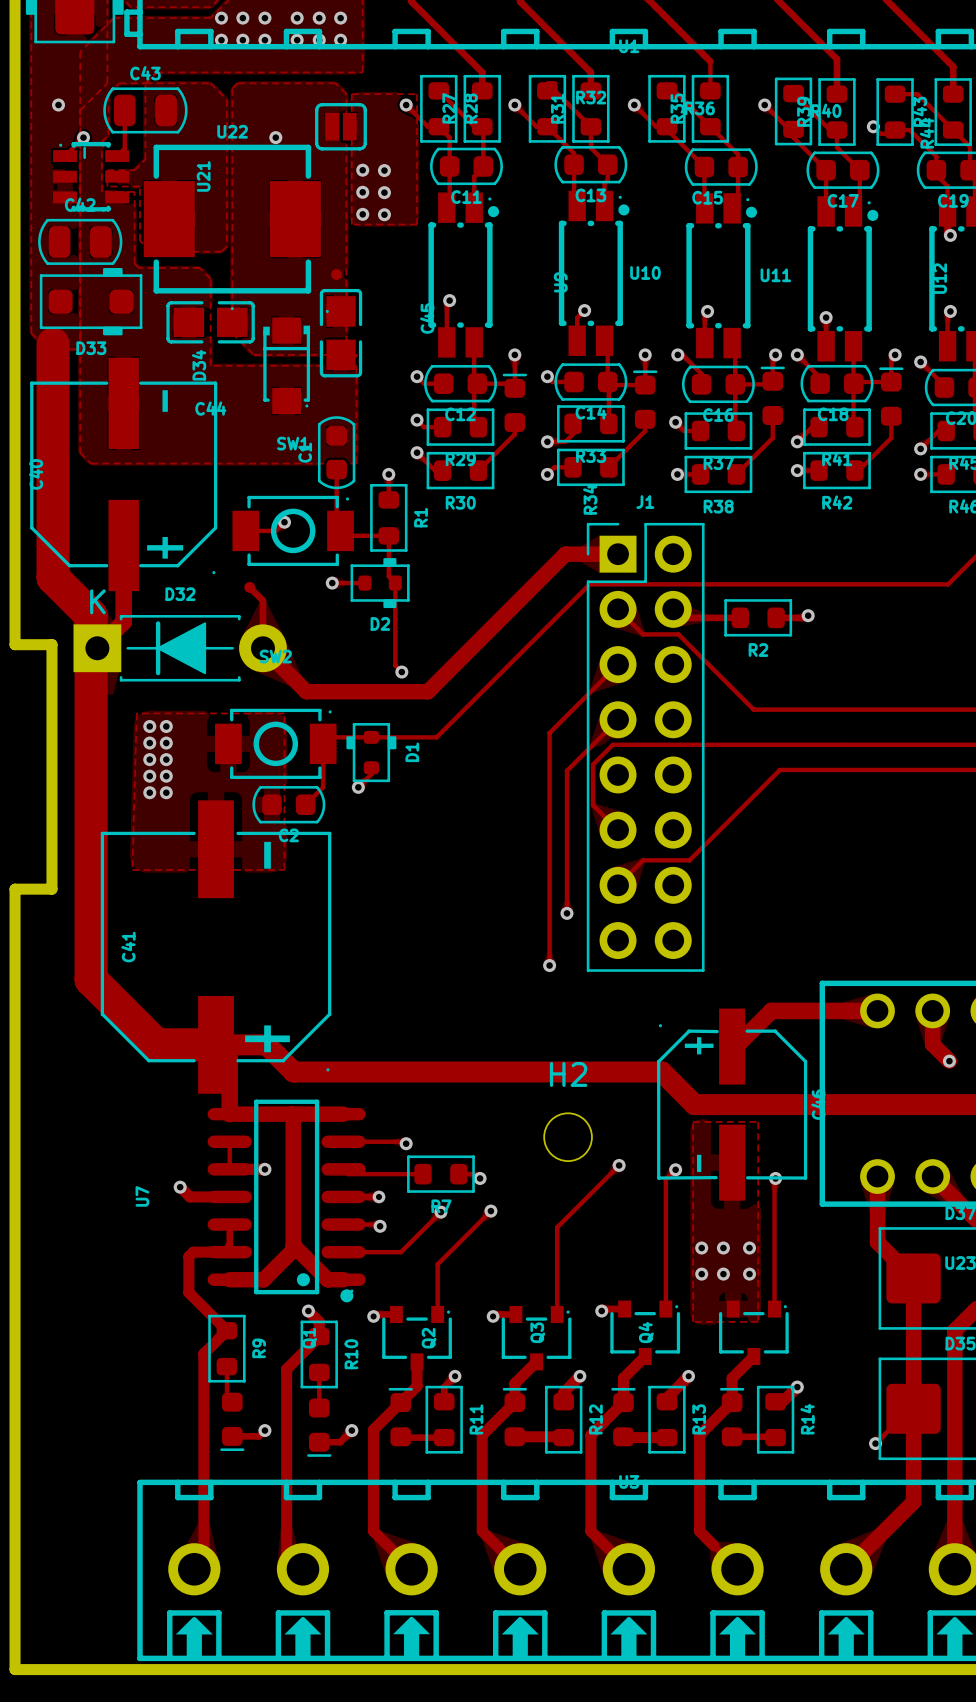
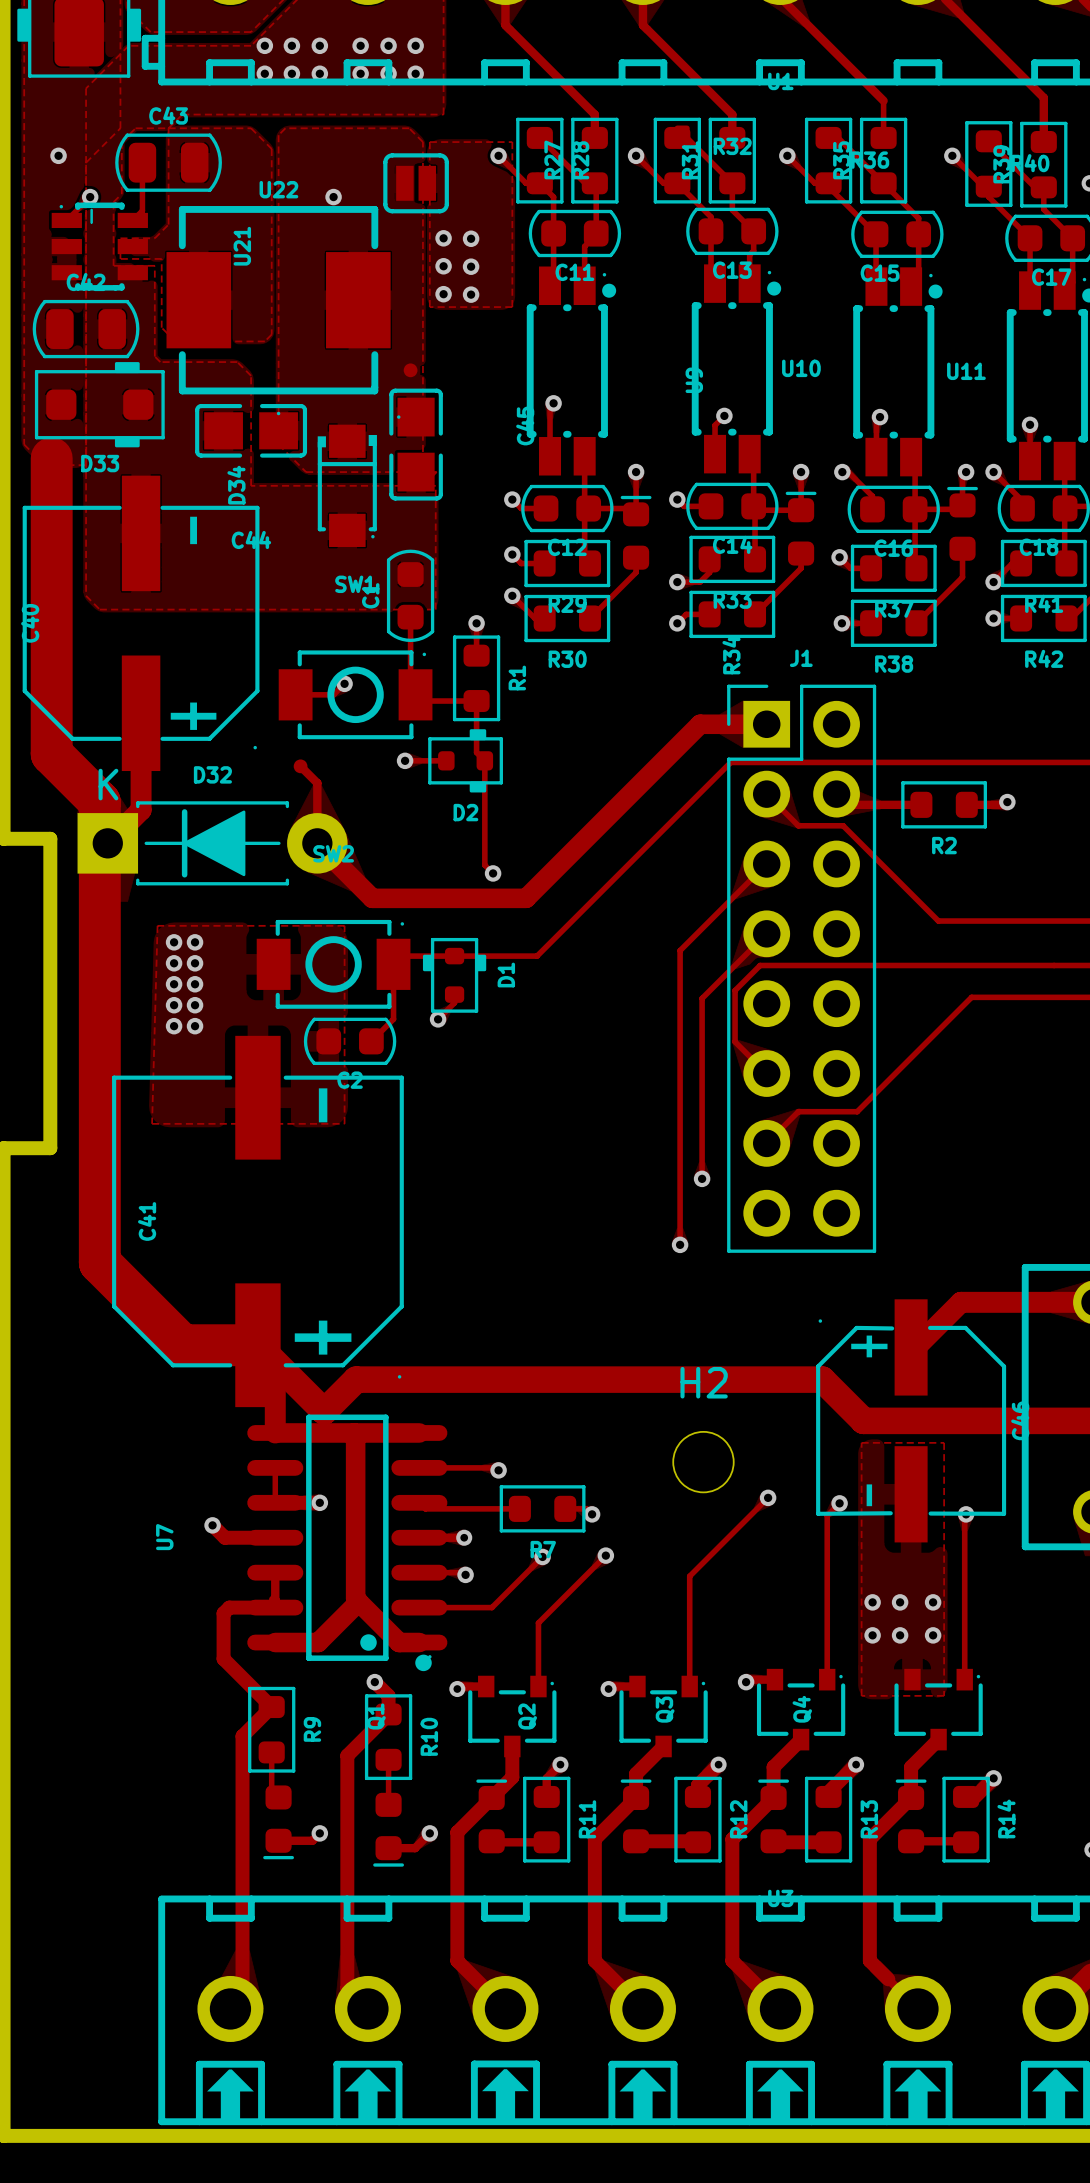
track: (216, 1044) (266, 1044) (293, 1072) -> (257, 1345) (324, 1411) (356, 1379)

